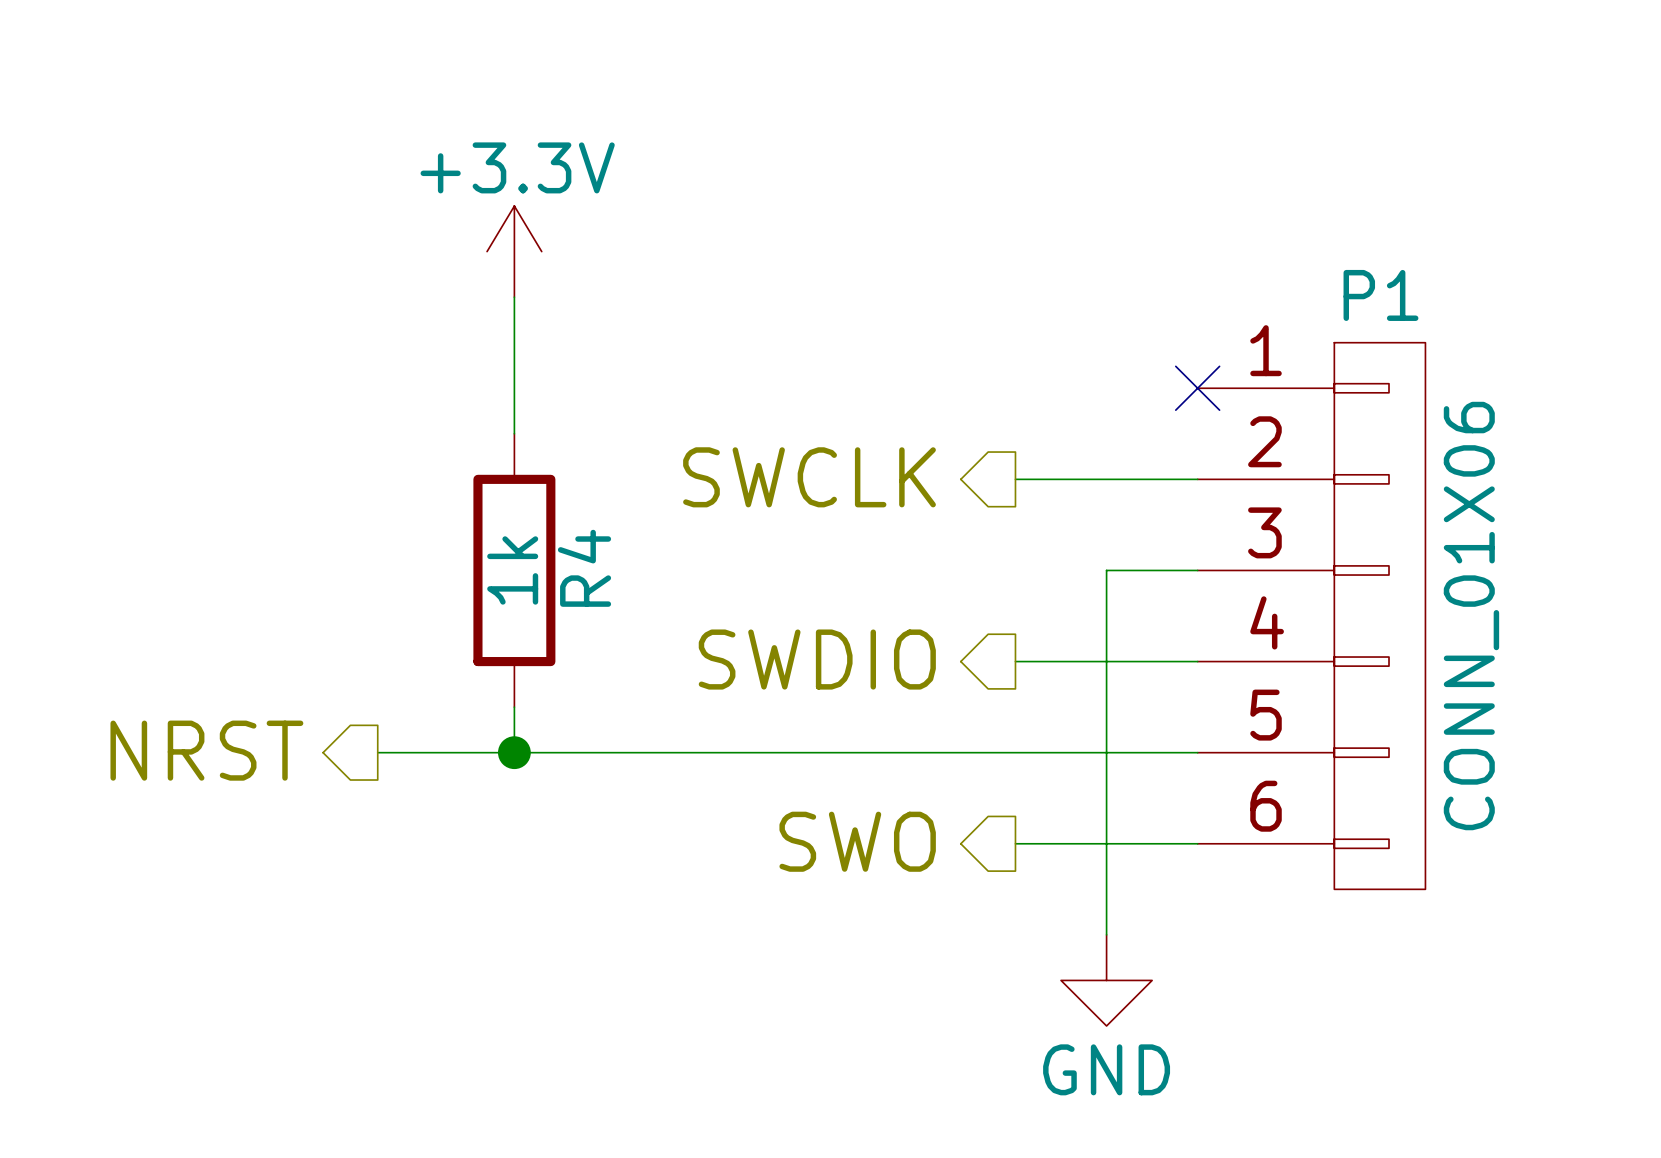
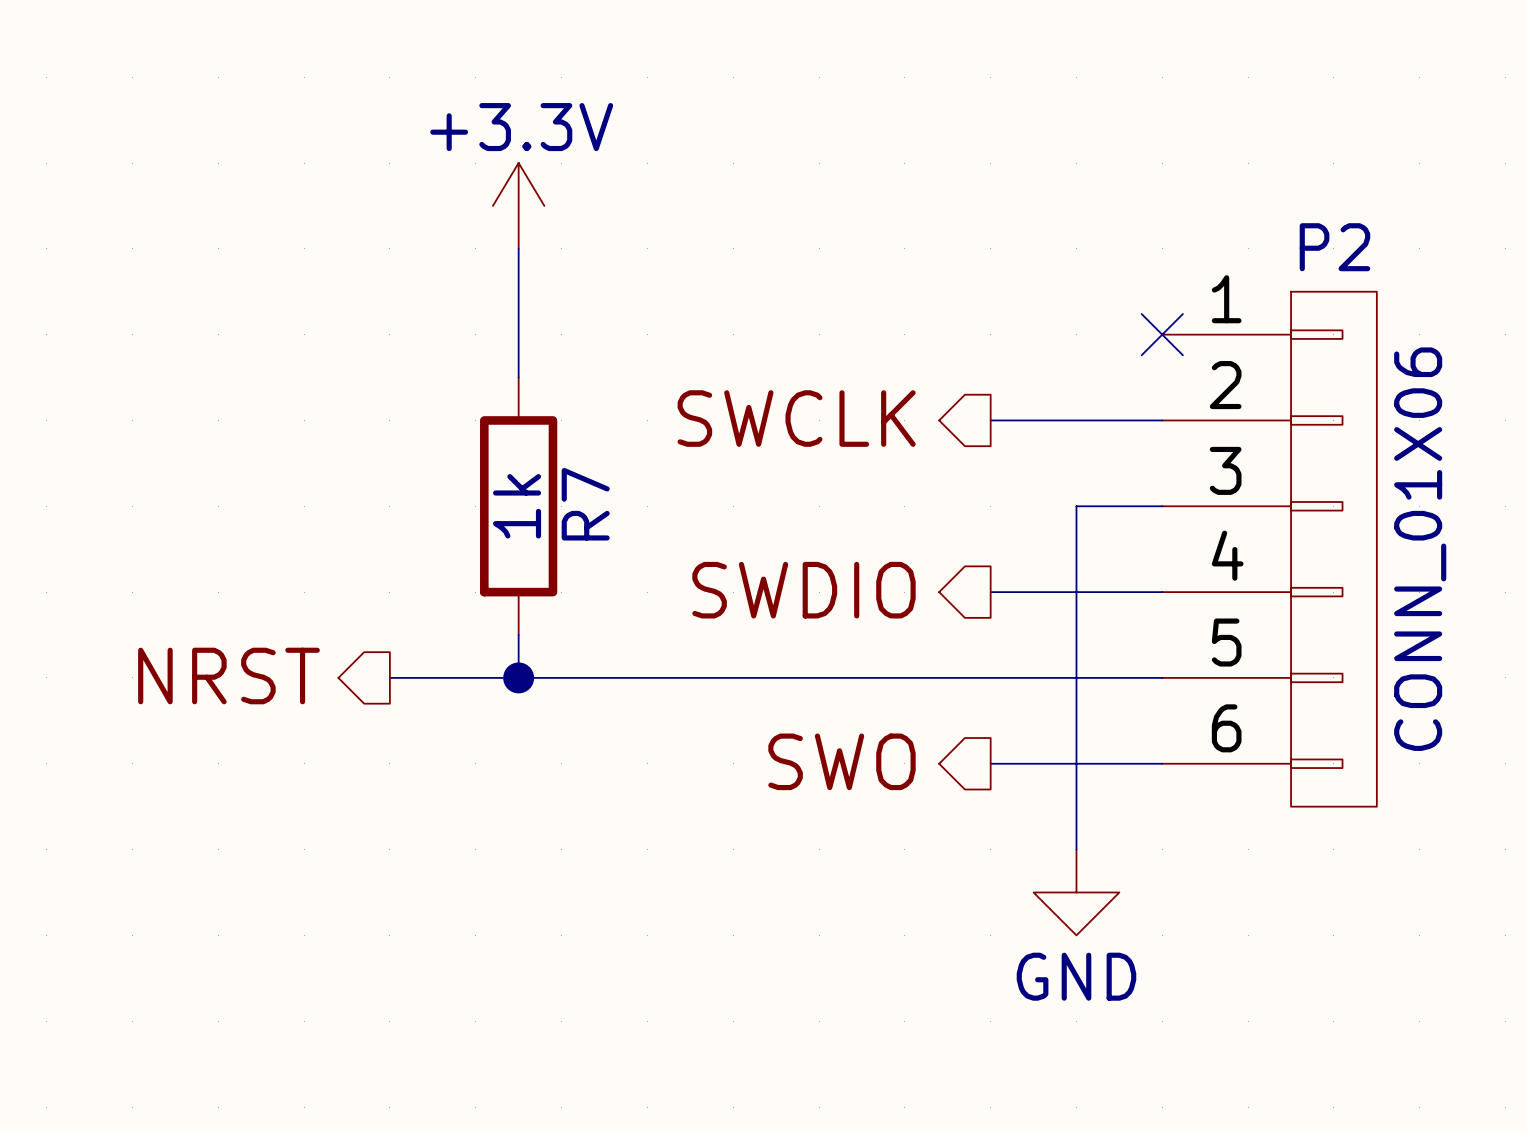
P1 name: P1 (1380, 295) -> P2 (1334, 247)
R4 name: R4 (584, 568) -> R7 (585, 504)

